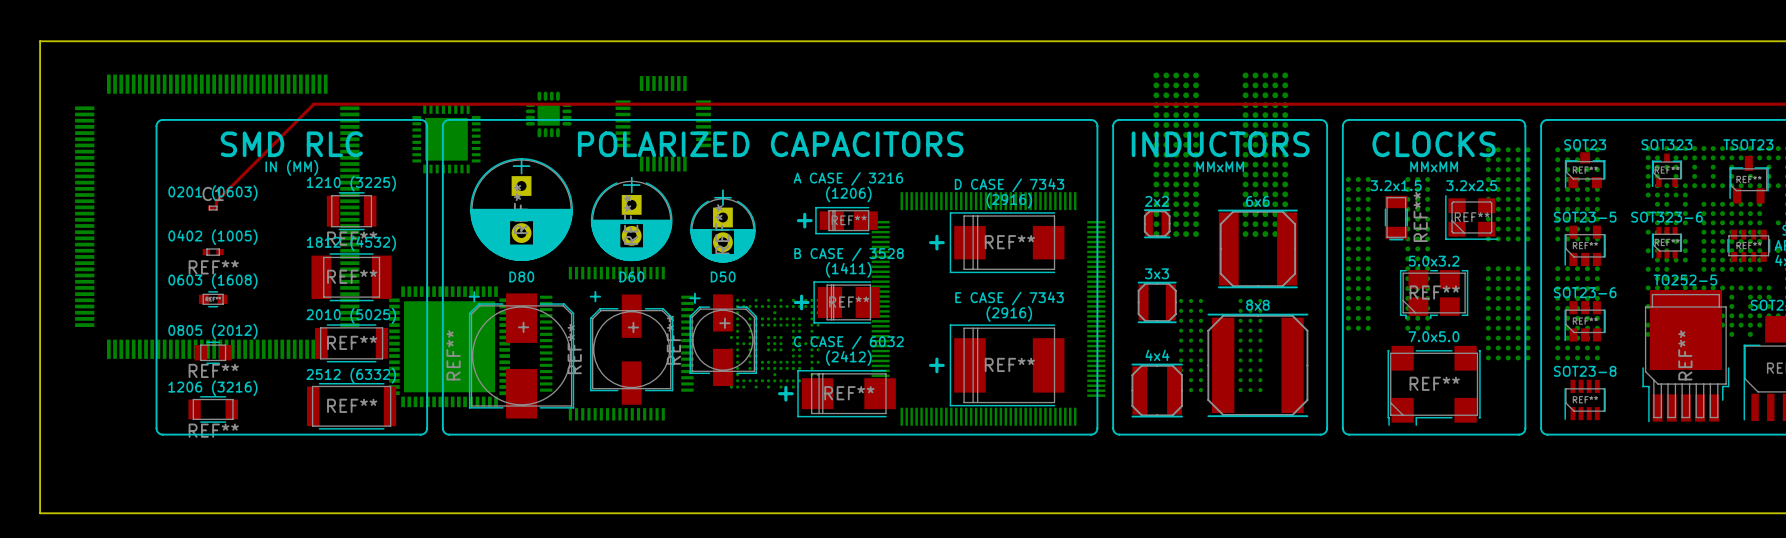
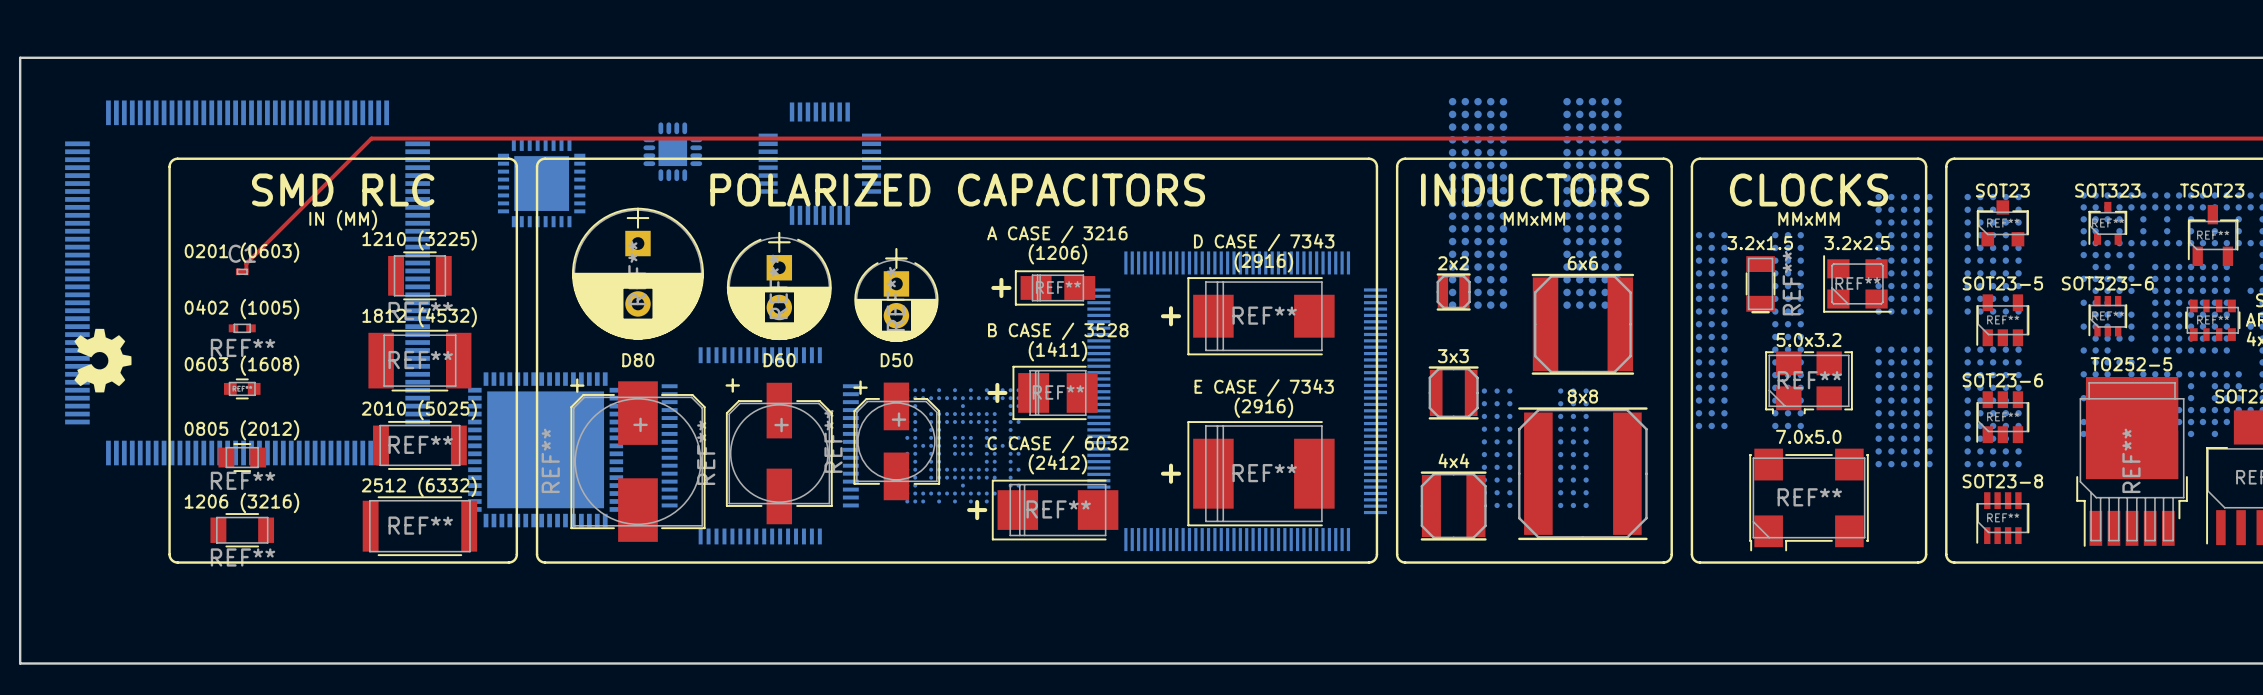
drawing: none -> [74, 328, 132, 393]

